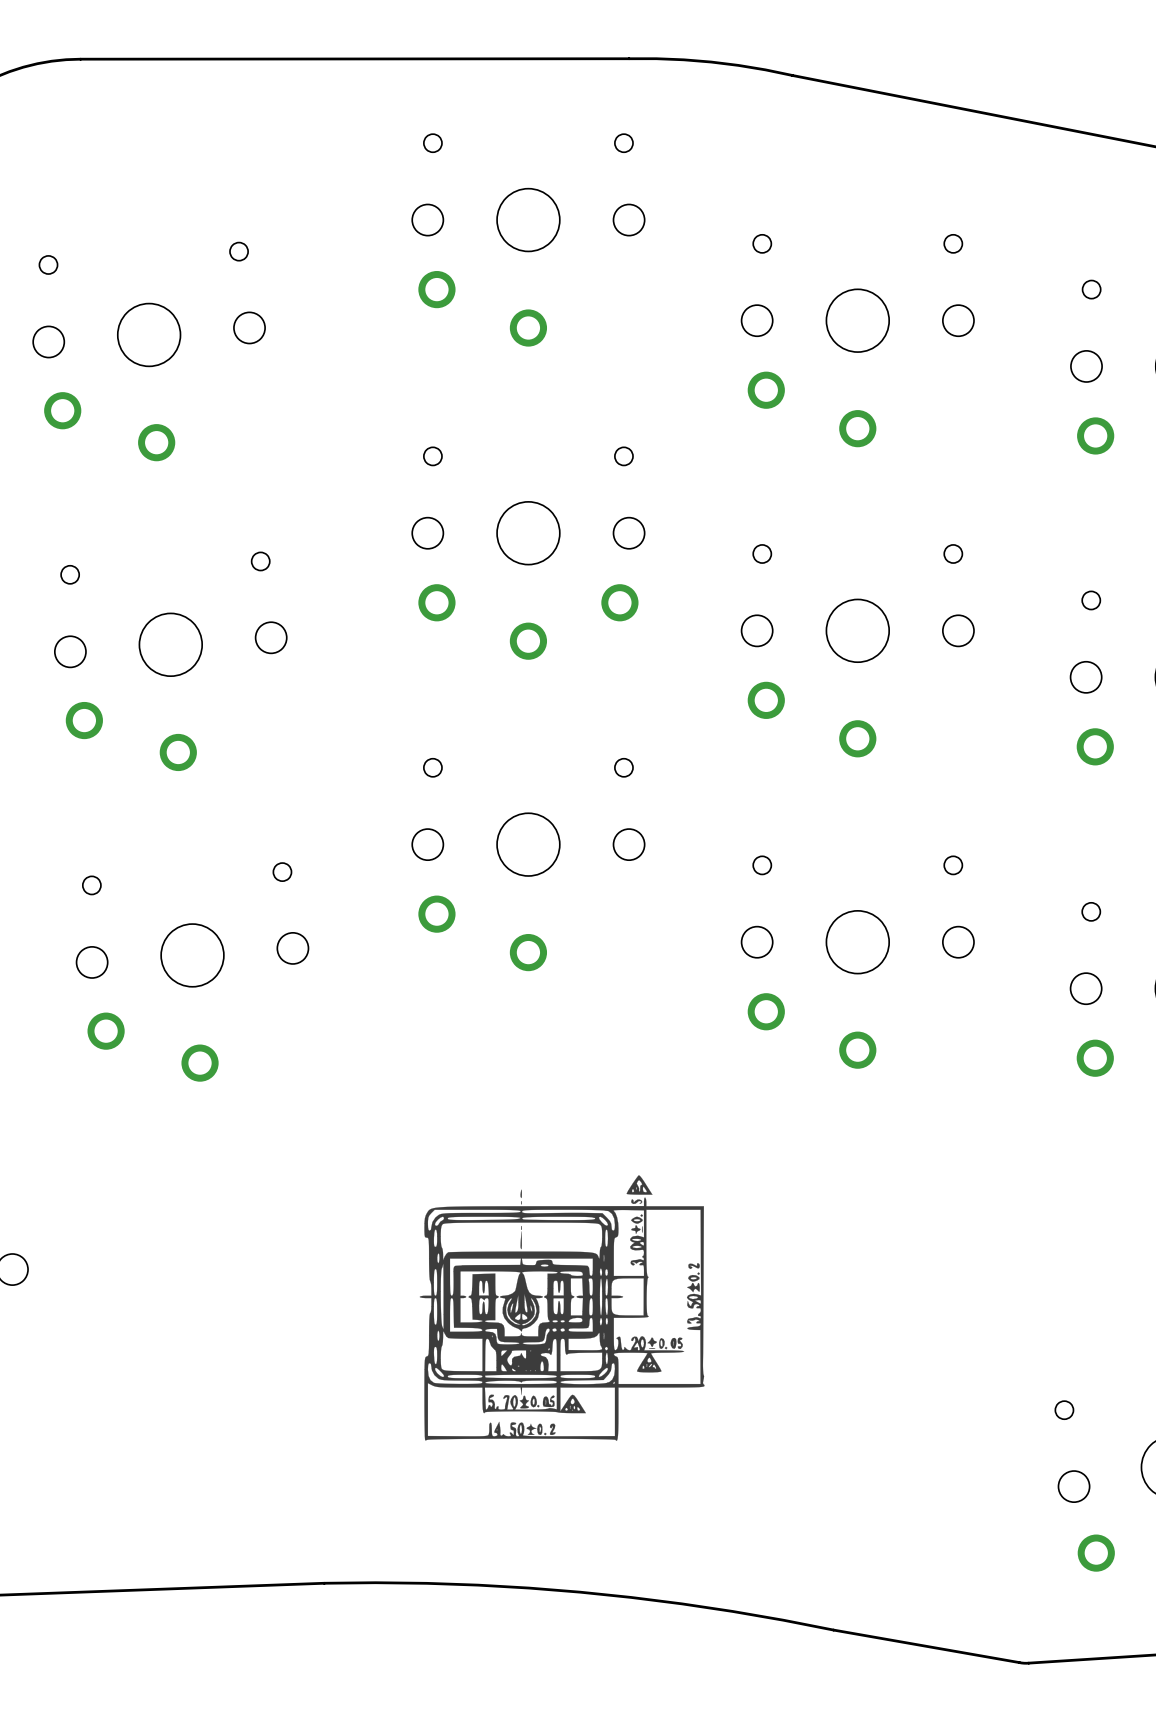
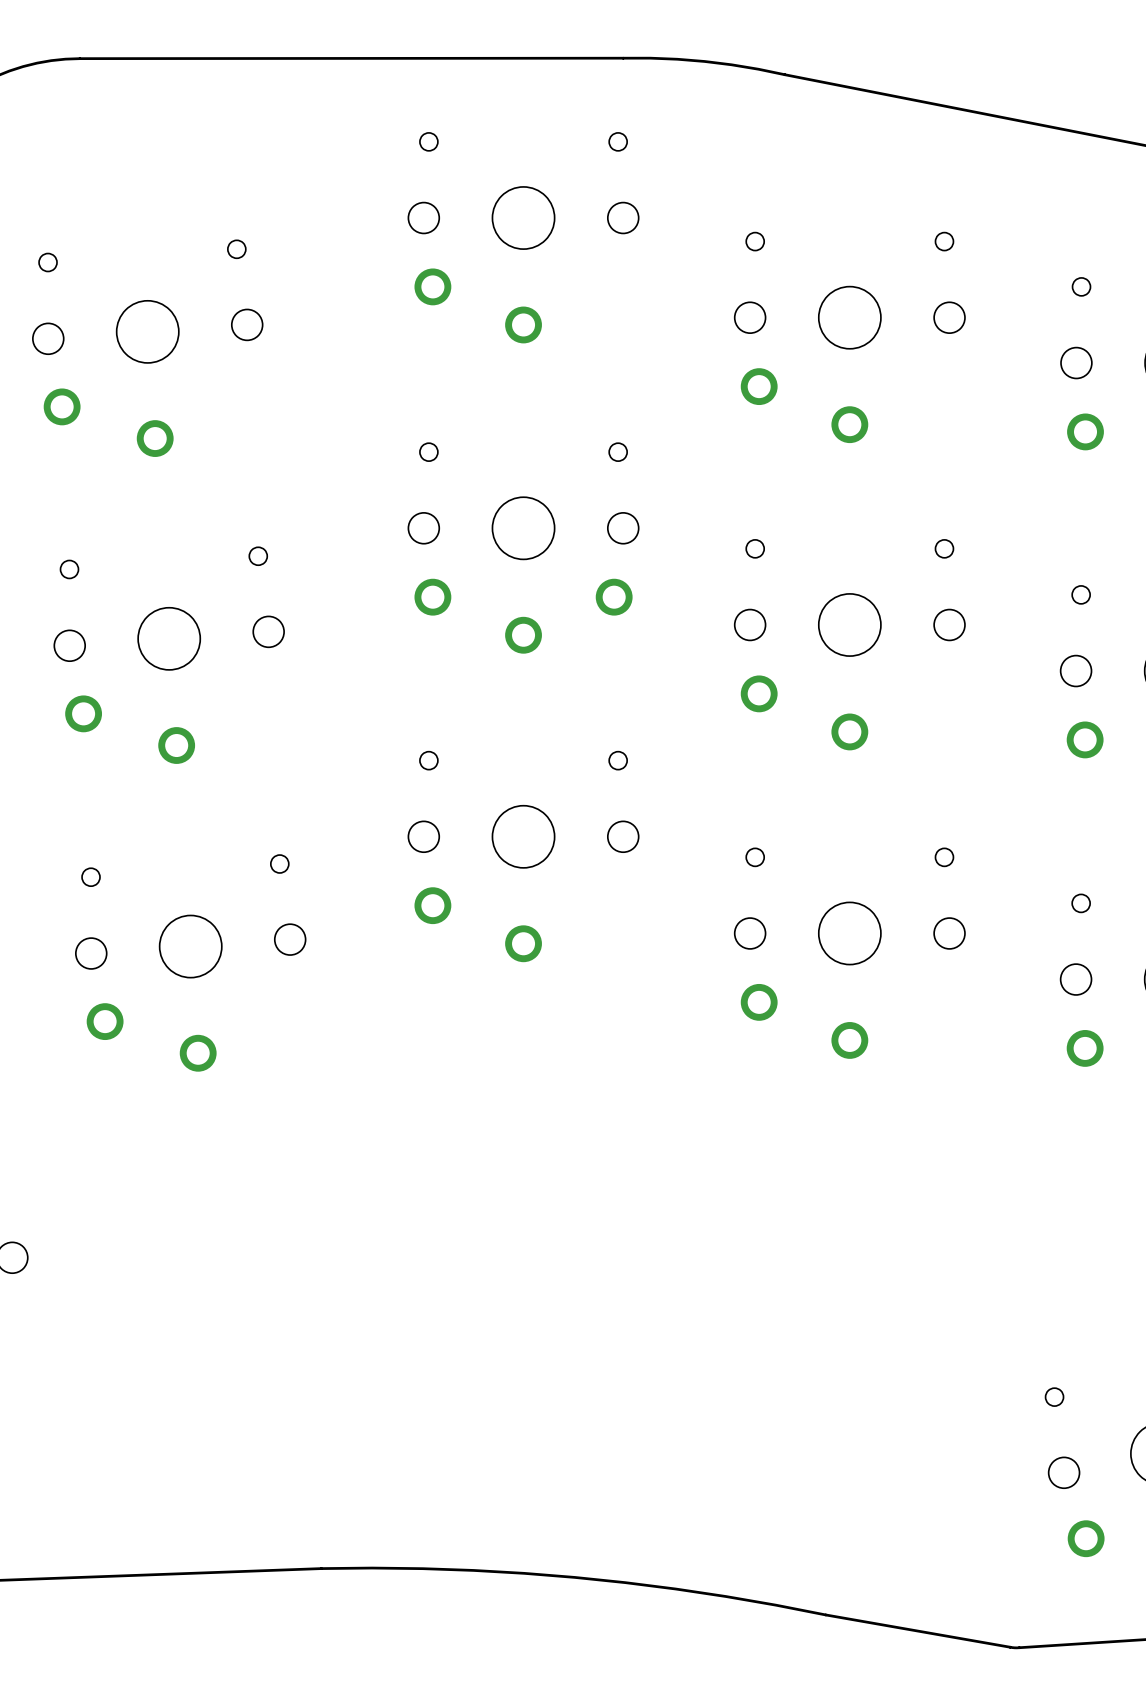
drawing: [419, 1175, 705, 1441] -> none

